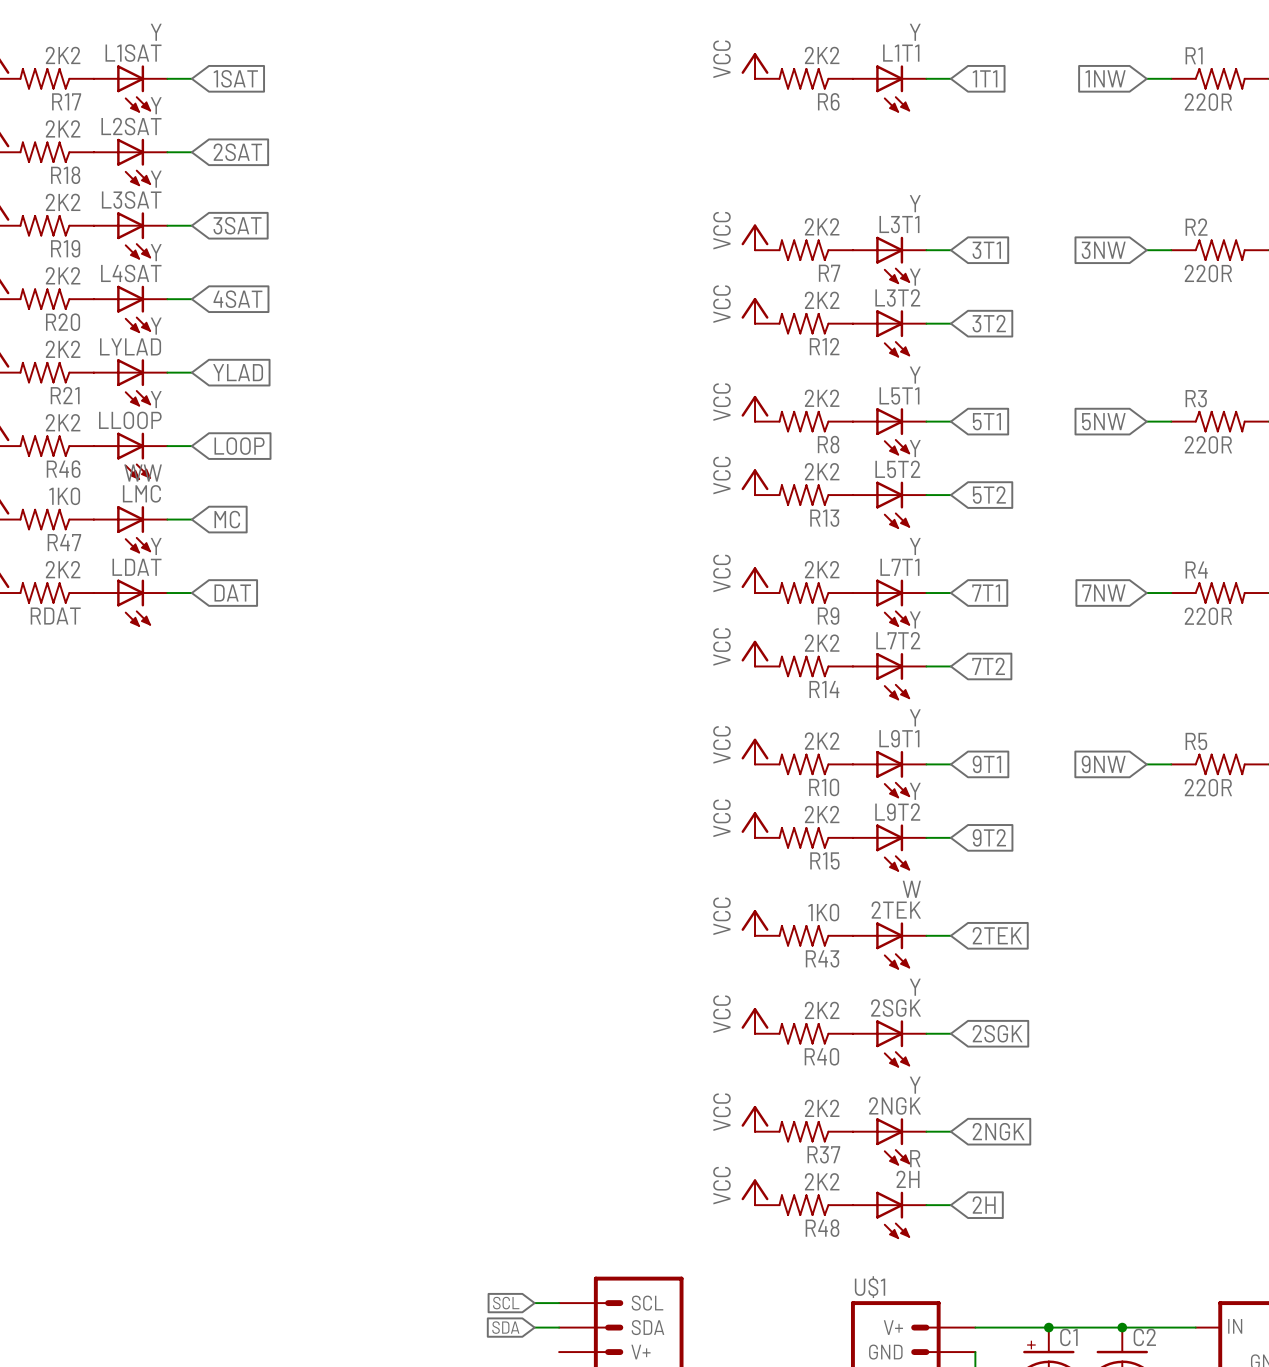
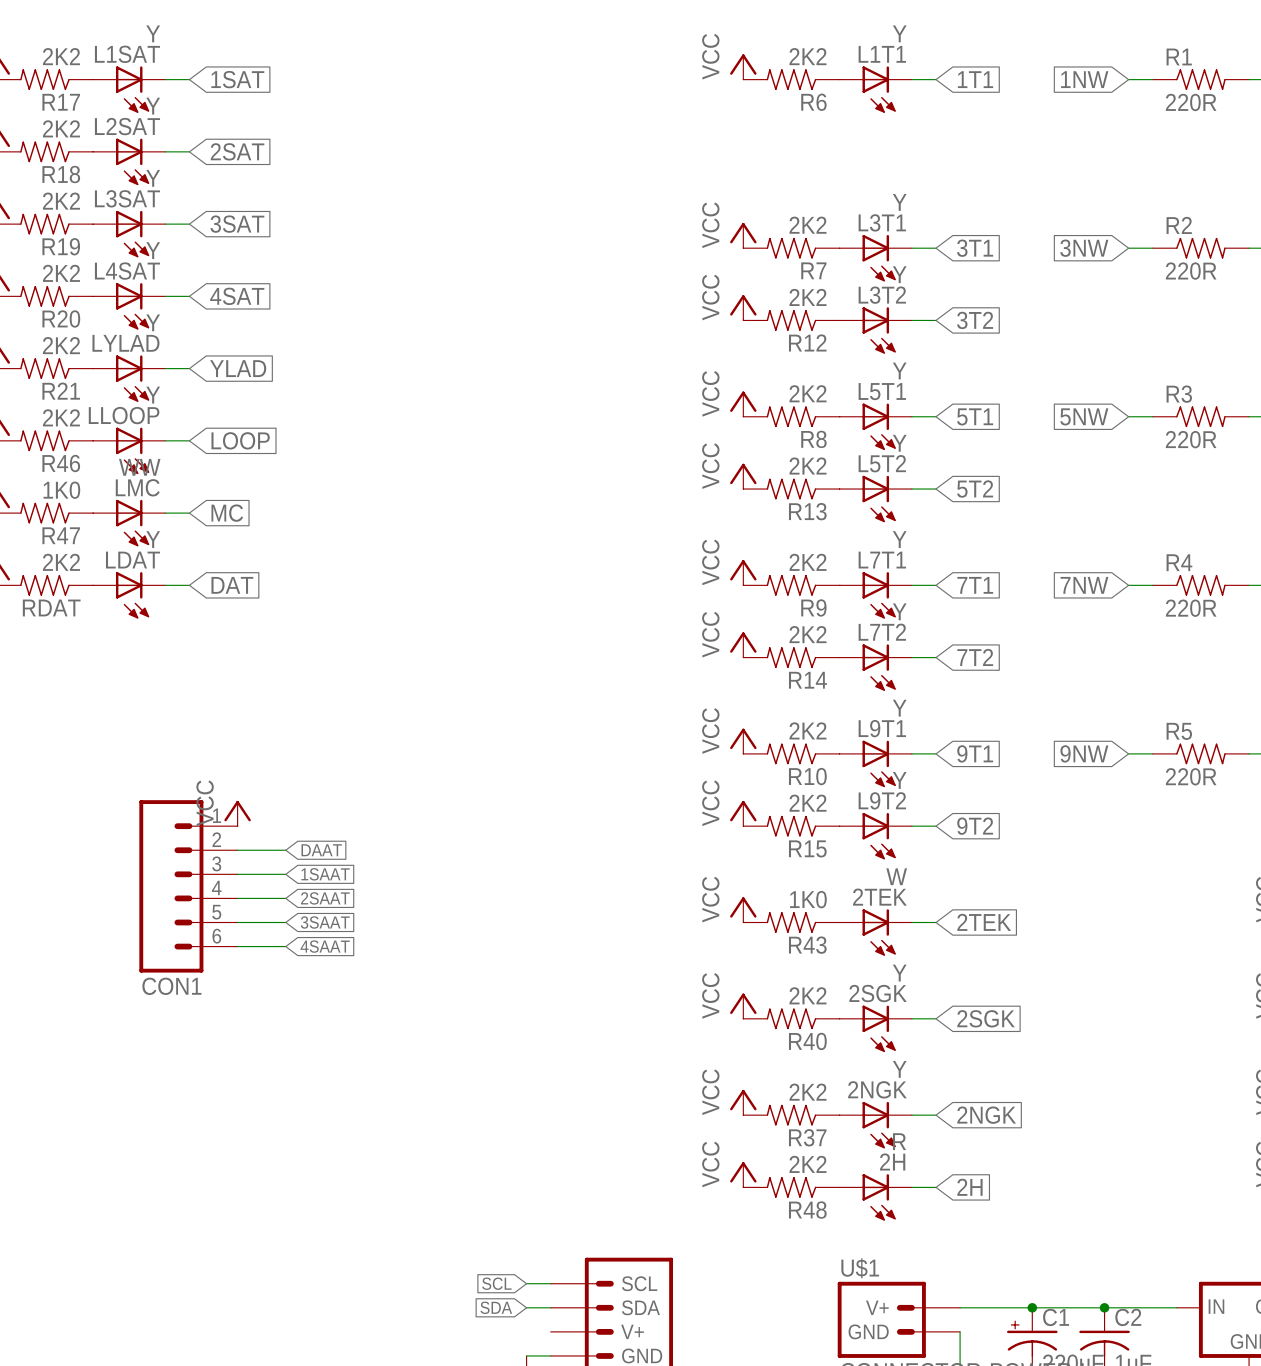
power symbol: none -> VCC (237, 813)
wire: none -> (237, 850) (285, 850)
global label: none -> DAAT (321, 850)
wire: none -> (237, 874) (285, 874)
global label: none -> 1SAAT (325, 874)
CON1: none -> (188, 886)
wire: none -> (237, 898) (285, 898)
global label: none -> 2SAAT (325, 898)
wire: none -> (237, 922) (285, 922)
global label: none -> 3SAAT (325, 922)
wire: none -> (237, 946) (285, 946)
global label: none -> 4SAAT (325, 946)

